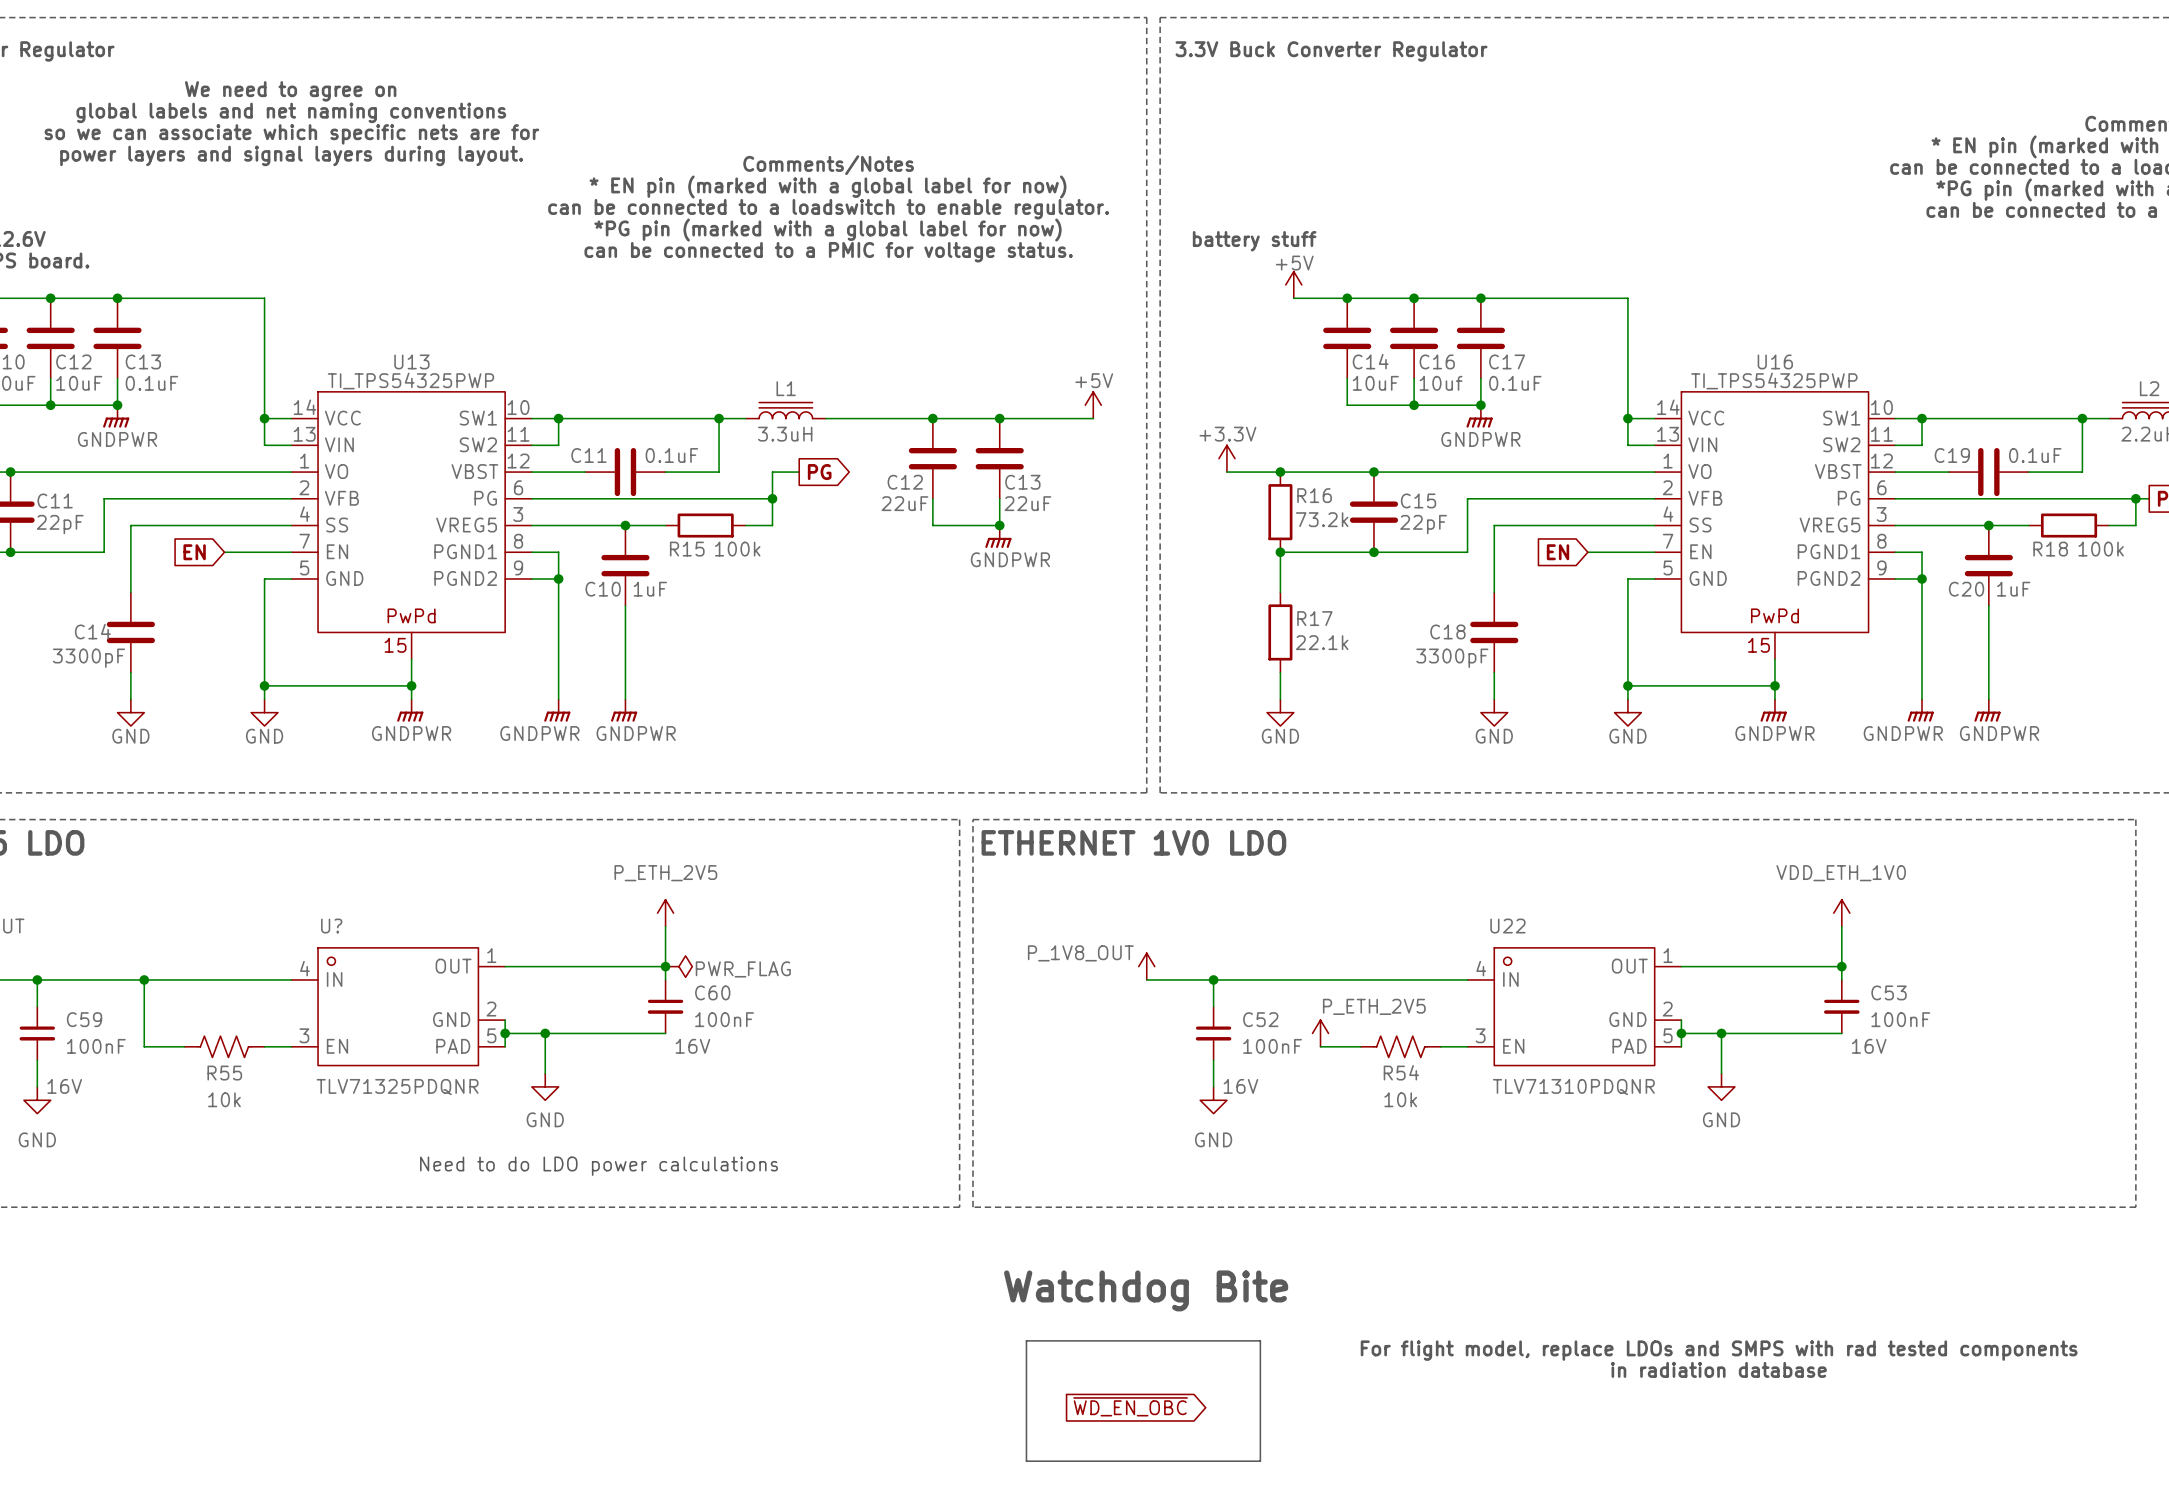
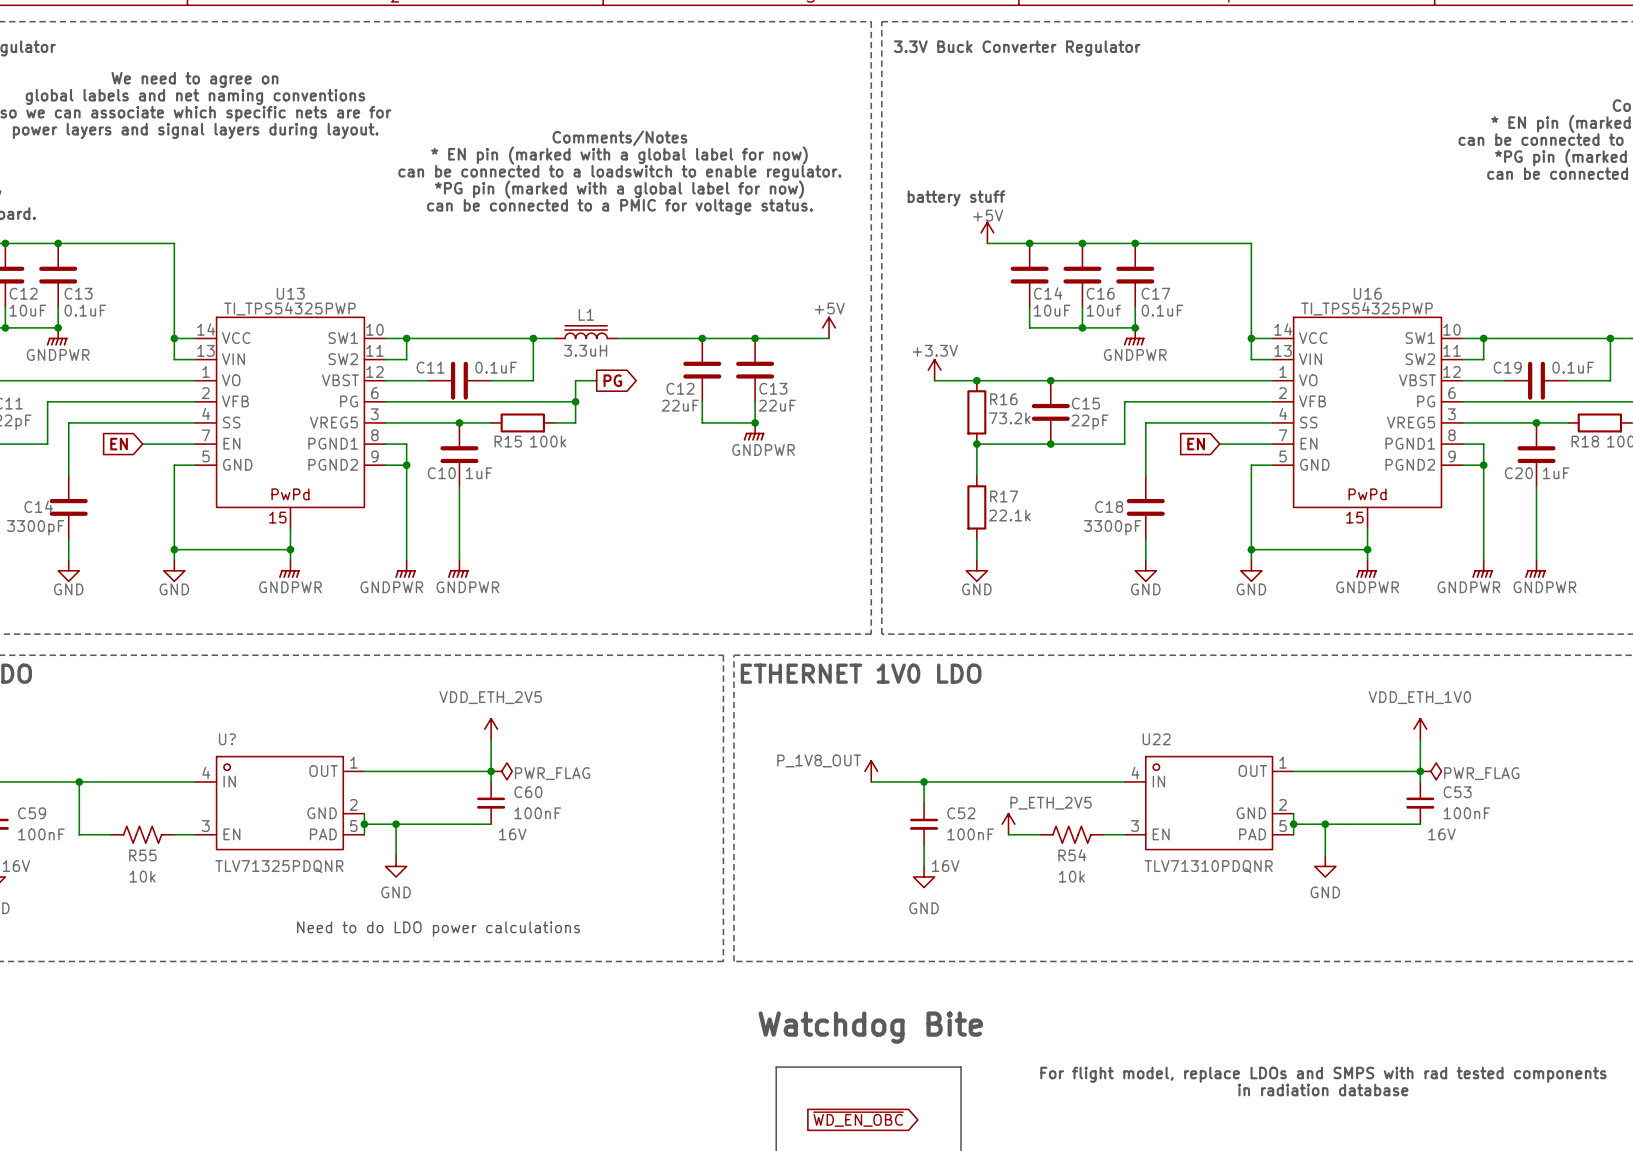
power symbol: P_ETH_2V5 (665, 913) -> VDD_ETH_2V5 (491, 729)
power symbol: none -> PWR_FLAG (1430, 771)

